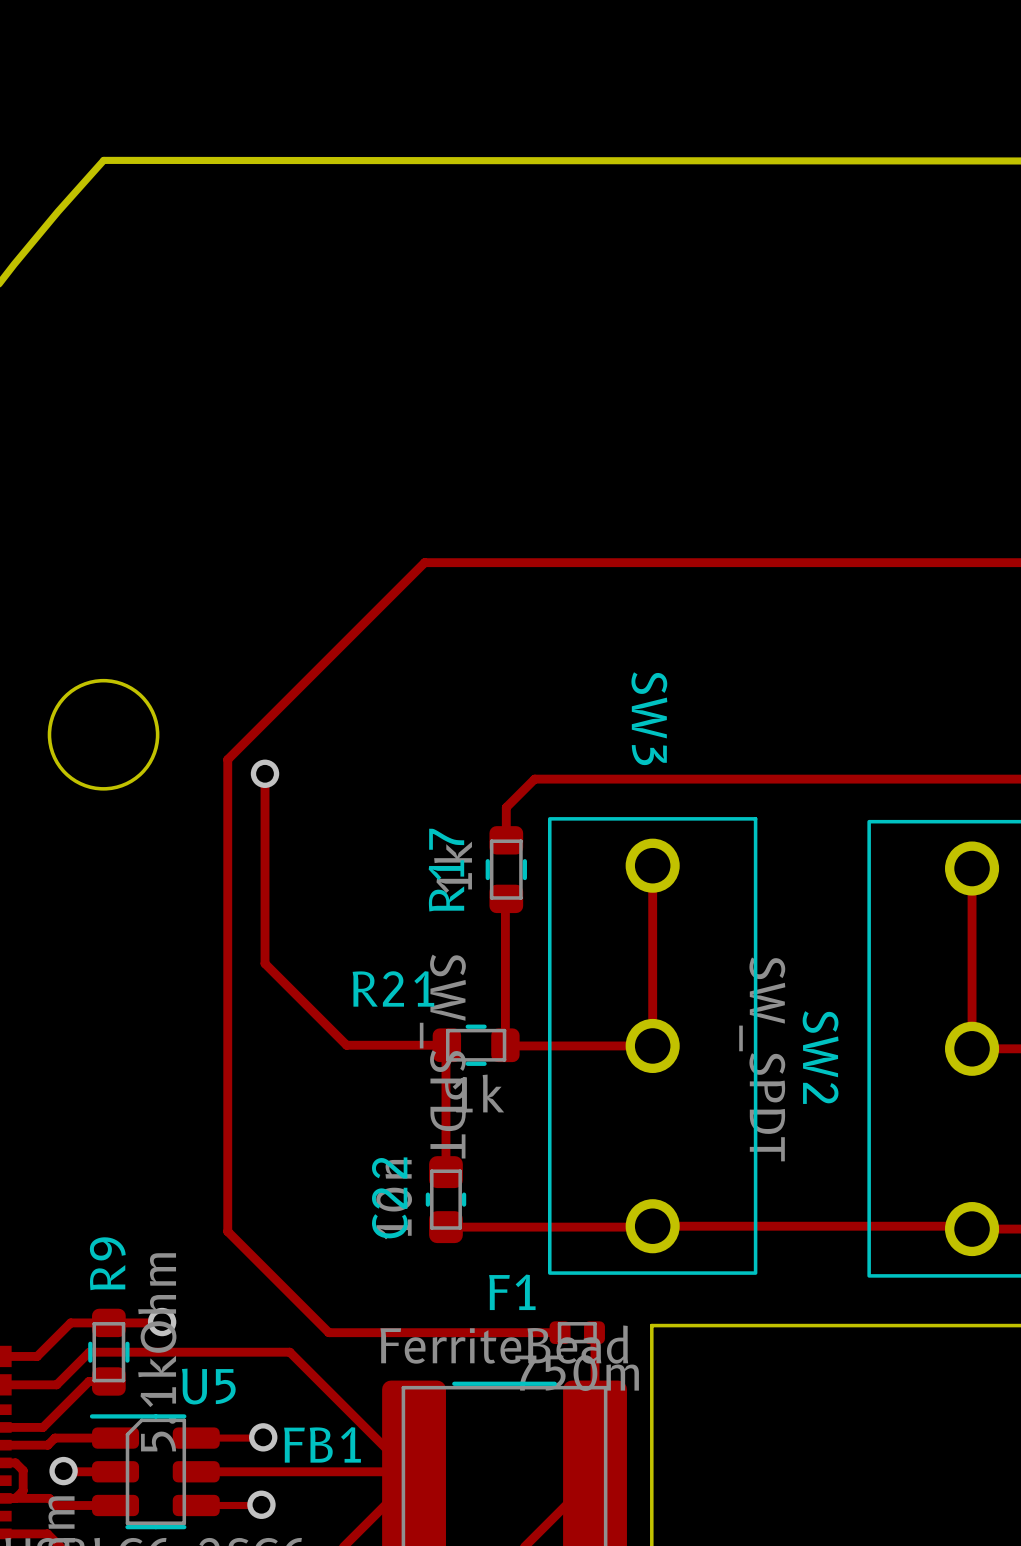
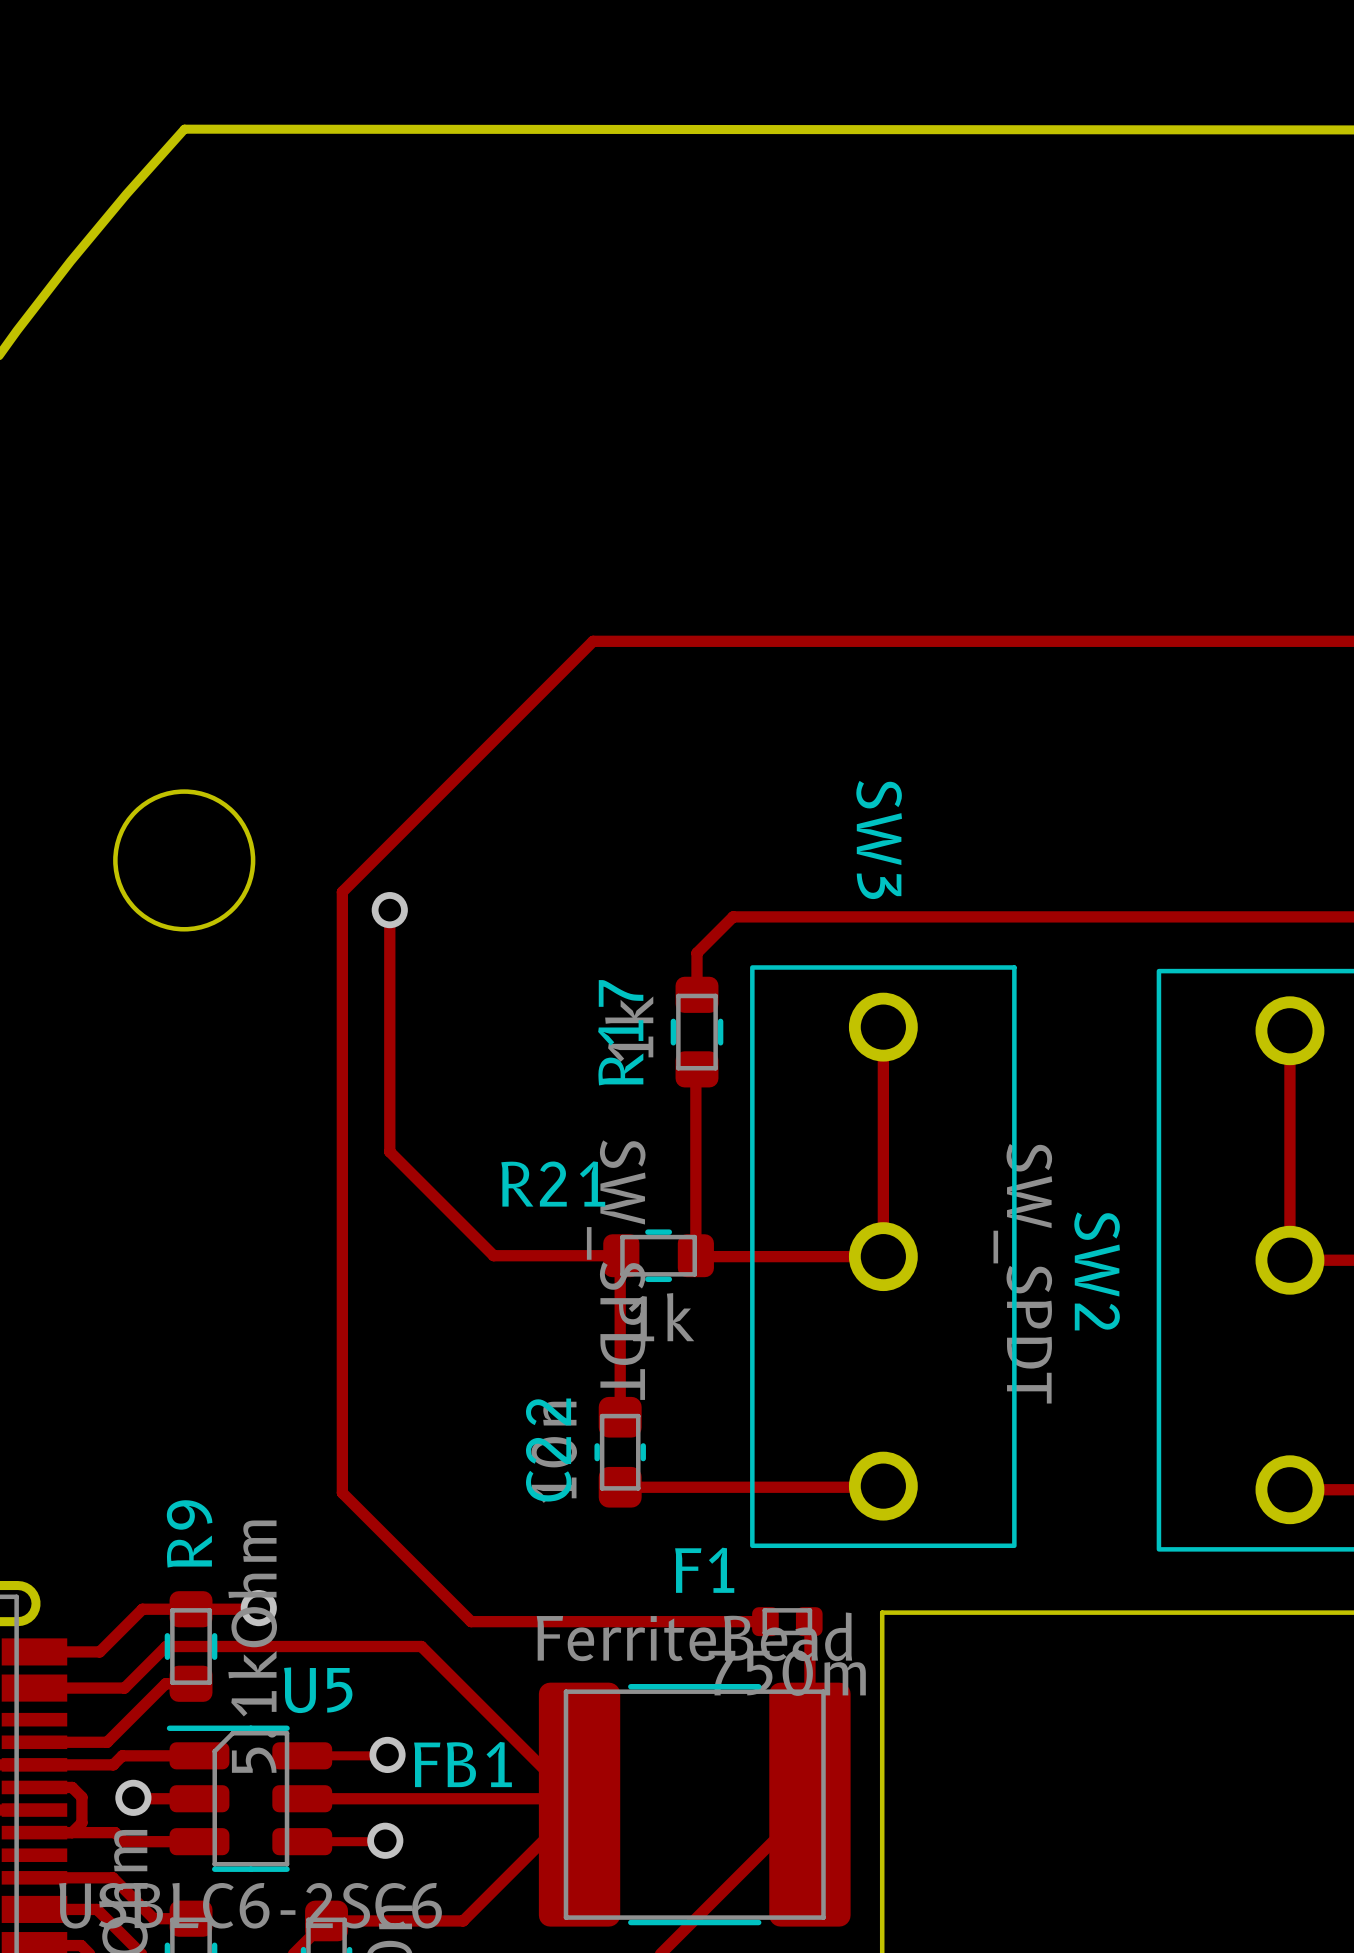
track: (652, 1226) (969, 1226) -> none

